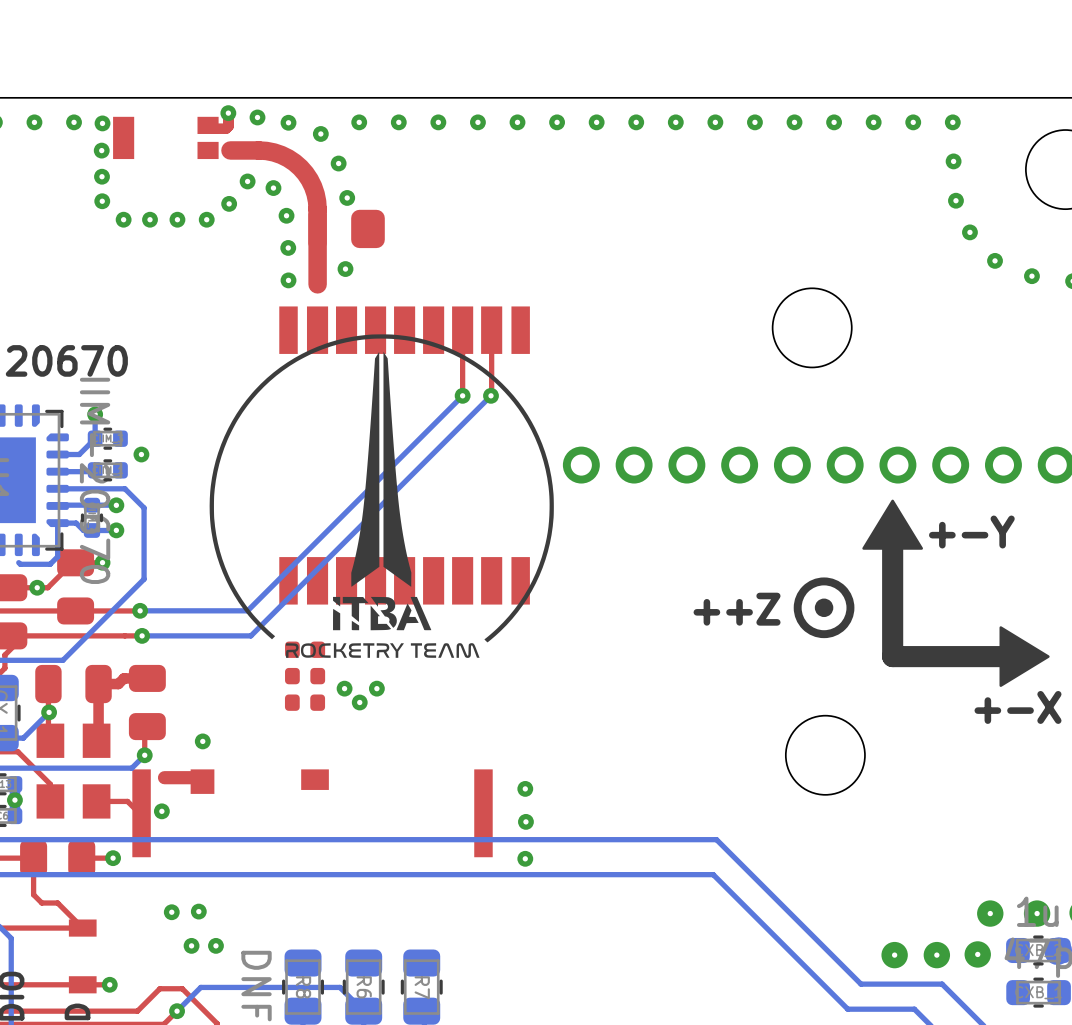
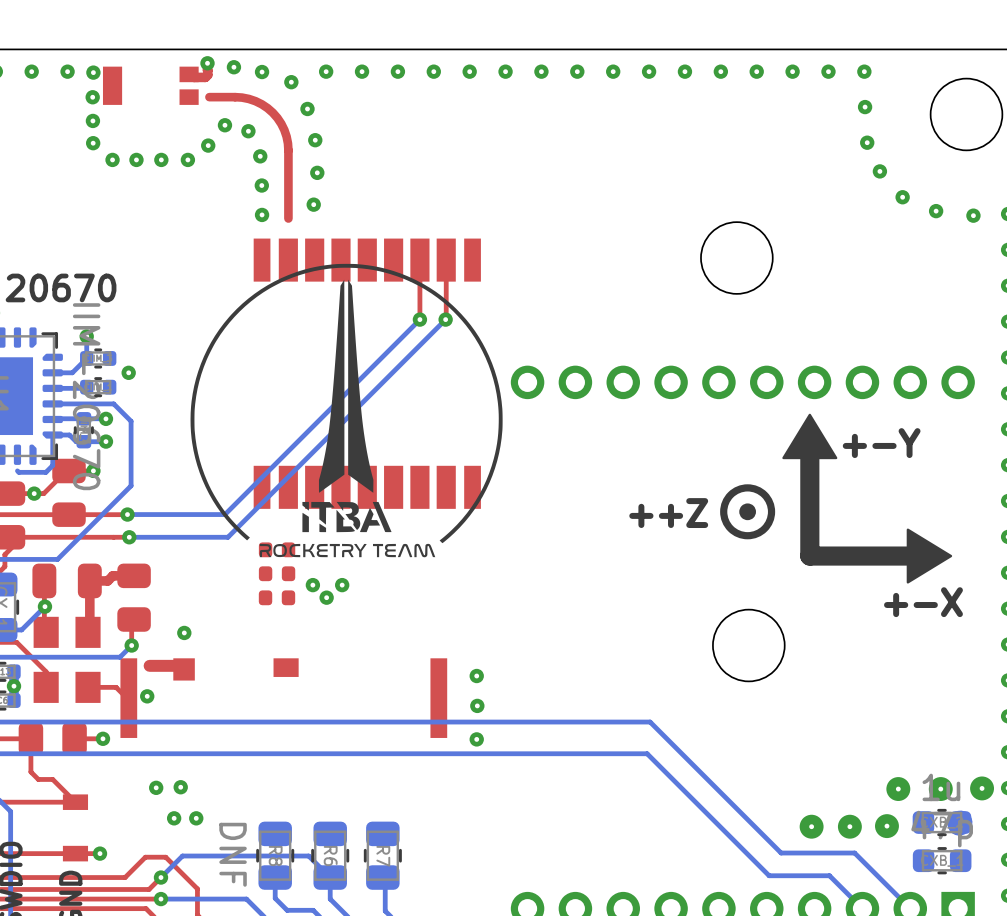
top track width: thick (258, 150) (281, 154) (294, 162) (305, 173) (313, 186) (317, 209) (317, 284) -> thin (235, 97) (255, 101) (267, 108) (277, 117) (284, 130) (288, 150) (288, 218)
top track width: thick (258, 150) (230, 150) -> thin (234, 97) (209, 97)
part: (346, 228) -> none
via: none -> (317, 172)

